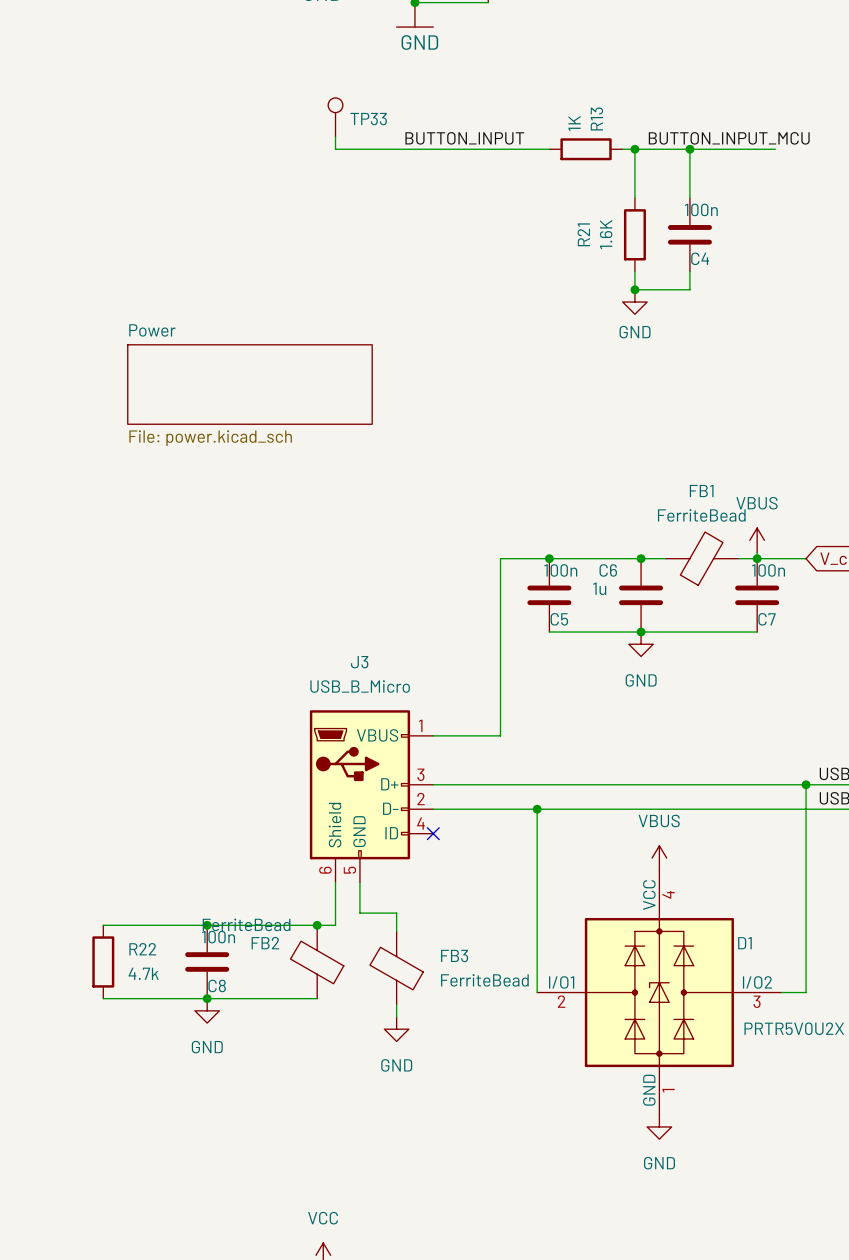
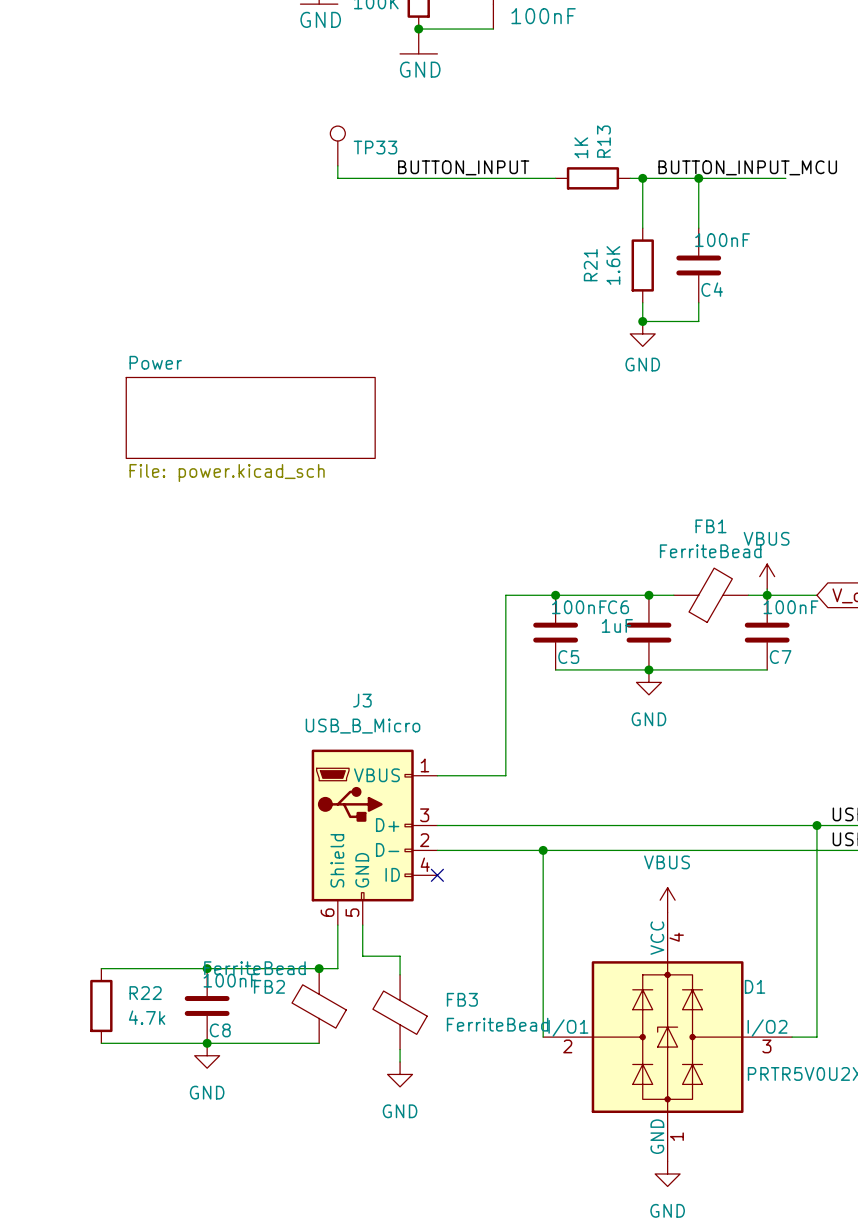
C4 value: 100n (701, 209) -> 100nF (722, 240)
C5 value: 100n (560, 570) -> 100nF (579, 607)
C7 value: 100n (768, 570) -> 100nF (790, 607)
C6 value: 1u (599, 588) -> 1uF (617, 625)
C8 value: 100n (218, 937) -> 100nF (230, 980)

